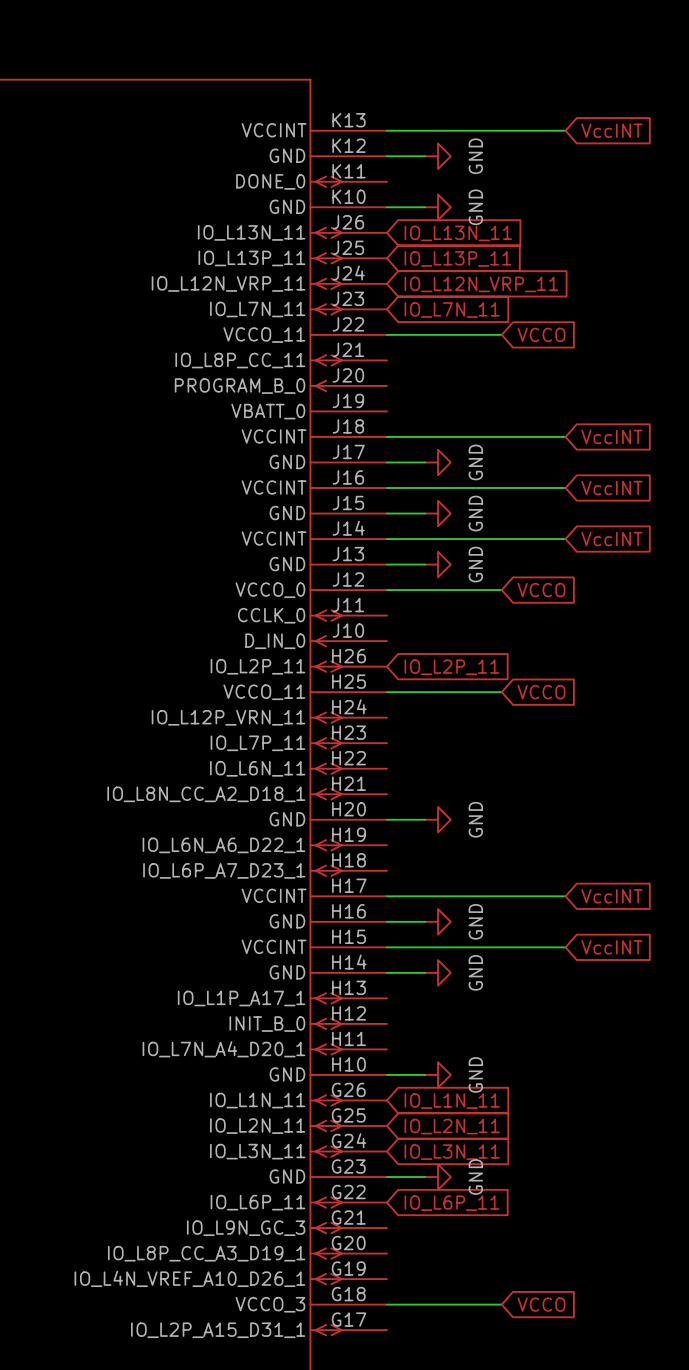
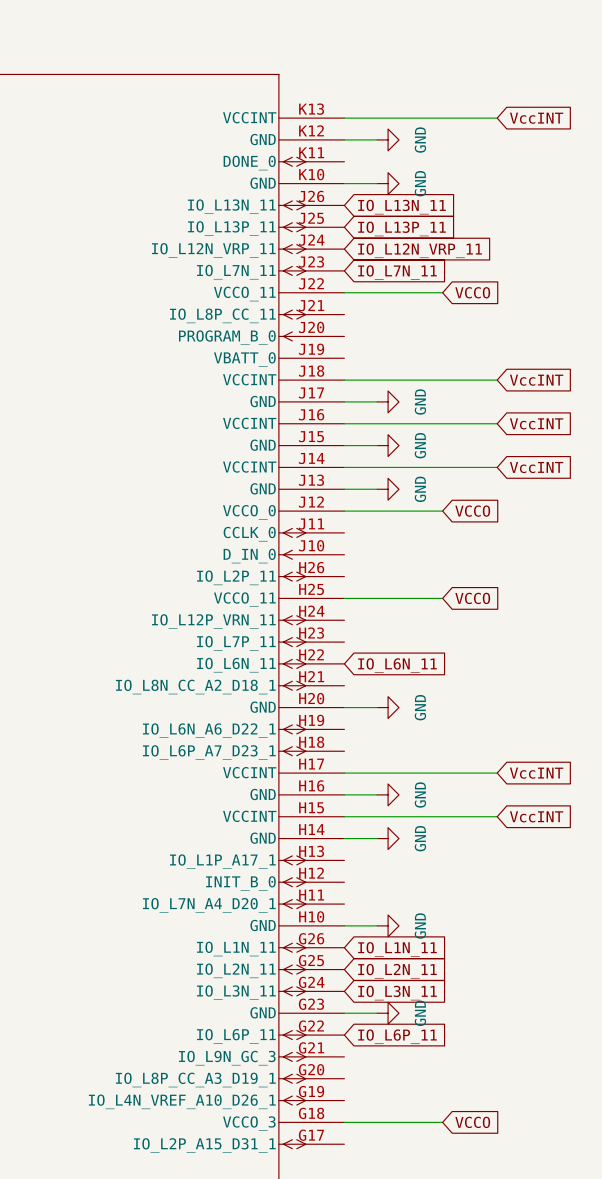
global label: IO_L2P_11 (451, 667) -> none
global label: none -> IO_L6N_11 (397, 665)

